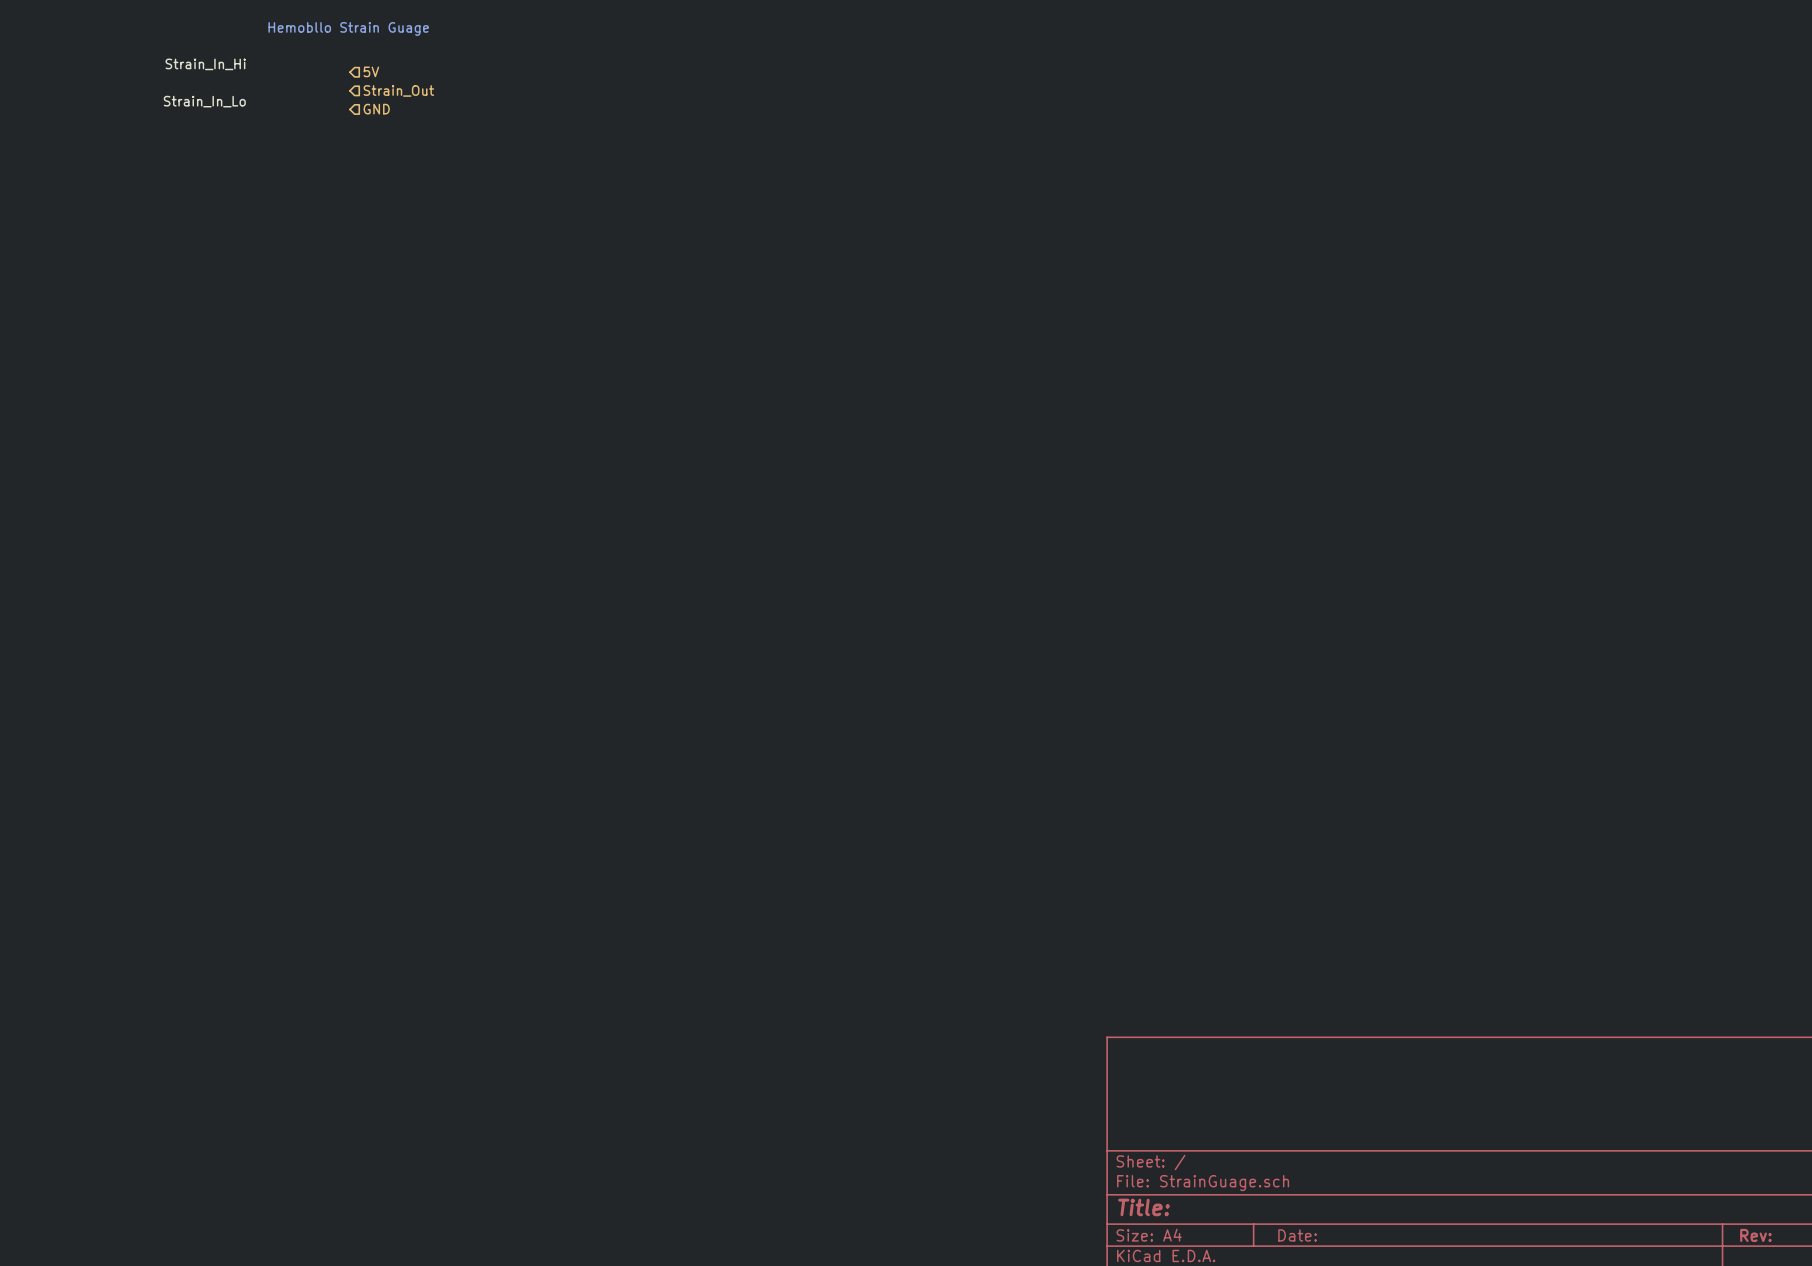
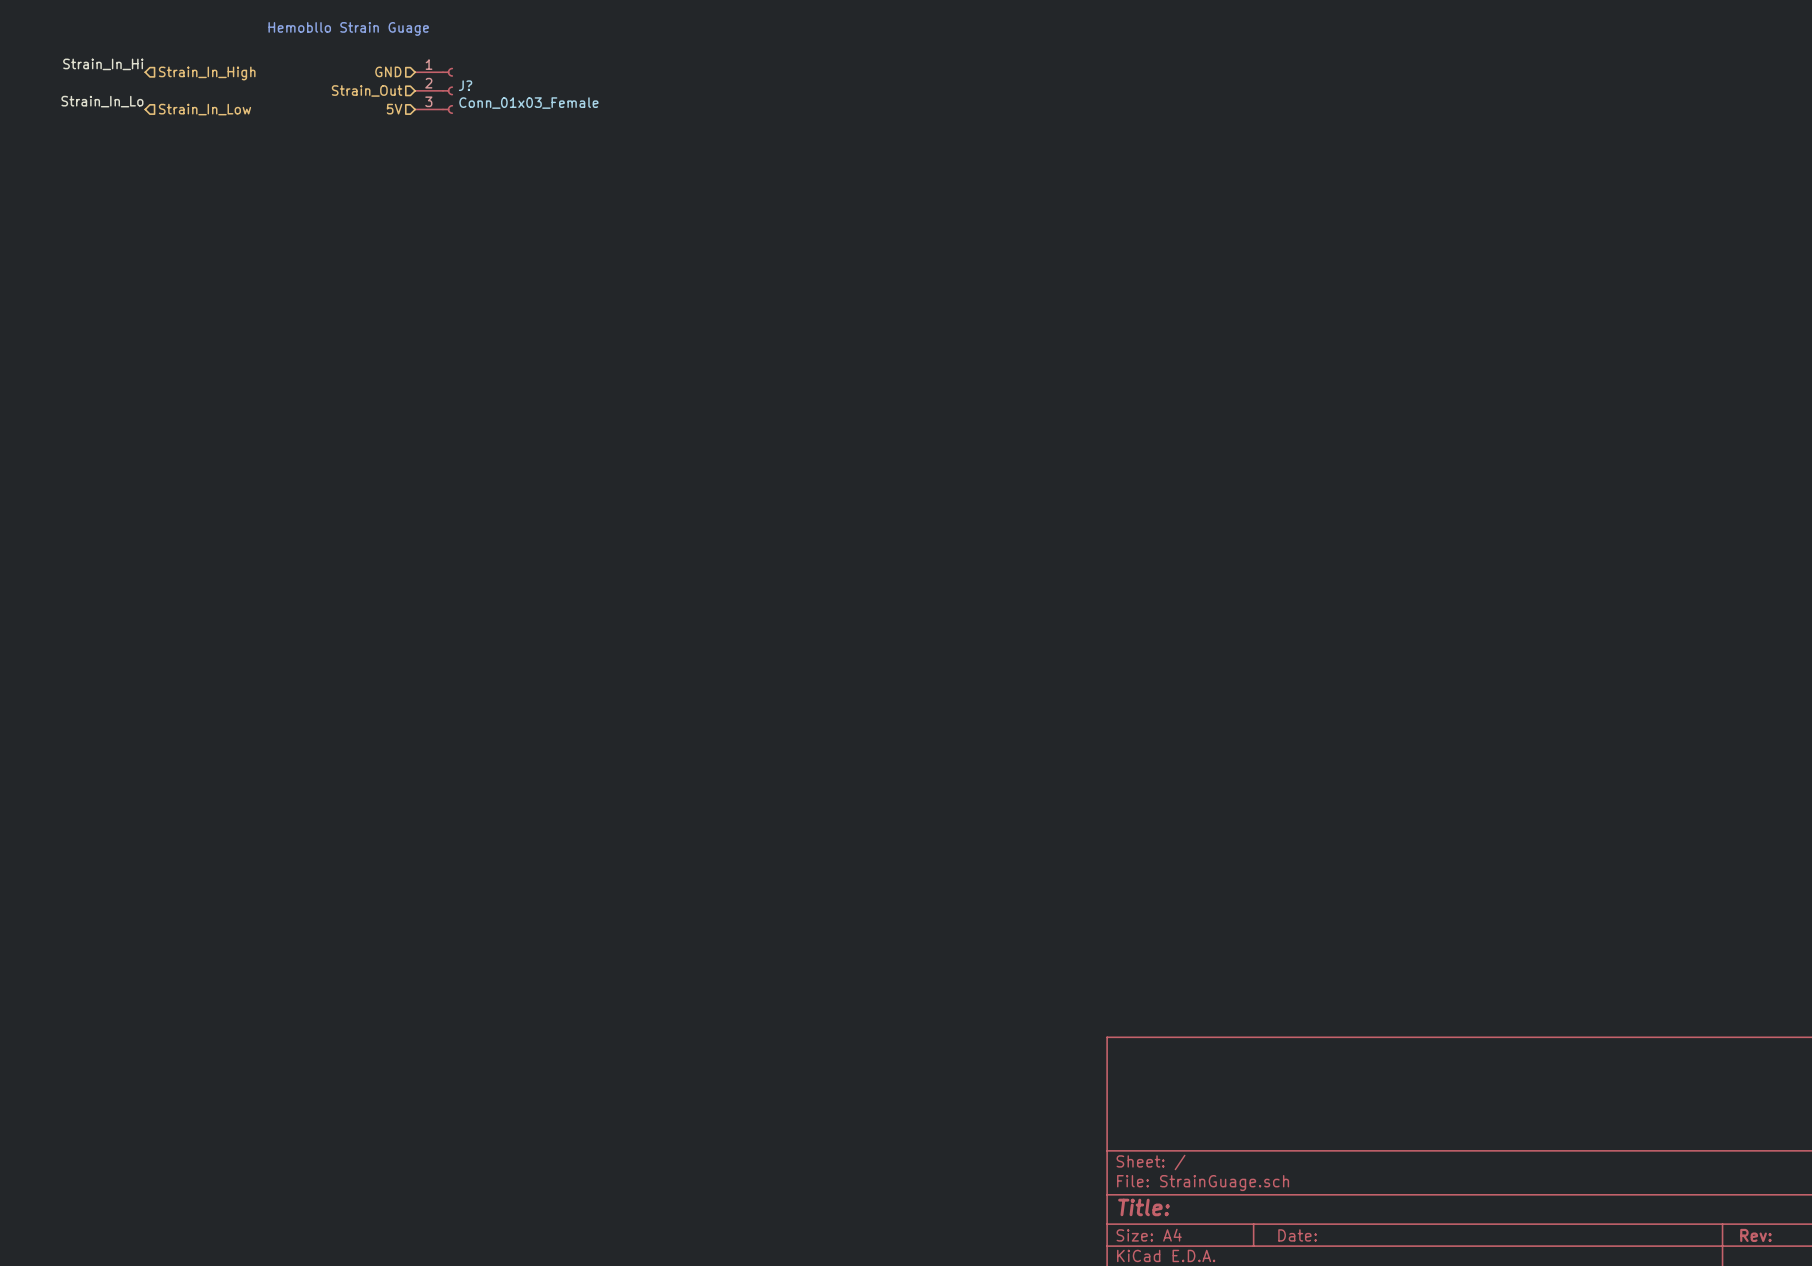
label position: Strain_In_Hi (205, 64) -> Strain_In_Hi (103, 64)
hierarchical label rotation: 0° (371, 71) -> 180° (394, 109)
hierarchical label position: 5V (371, 71) -> 5V (394, 109)
hierarchical label: none -> Strain_In_High (207, 73)
hierarchical label rotation: 0° (398, 90) -> 180° (367, 90)
J?: none -> Conn_01x03_Female (433, 90)
label position: Strain_In_Lo (204, 101) -> Strain_In_Lo (102, 101)
hierarchical label: none -> Strain_In_Low (204, 109)
hierarchical label rotation: 0° (376, 109) -> 180° (388, 71)
hierarchical label position: GND (376, 109) -> GND (388, 71)

